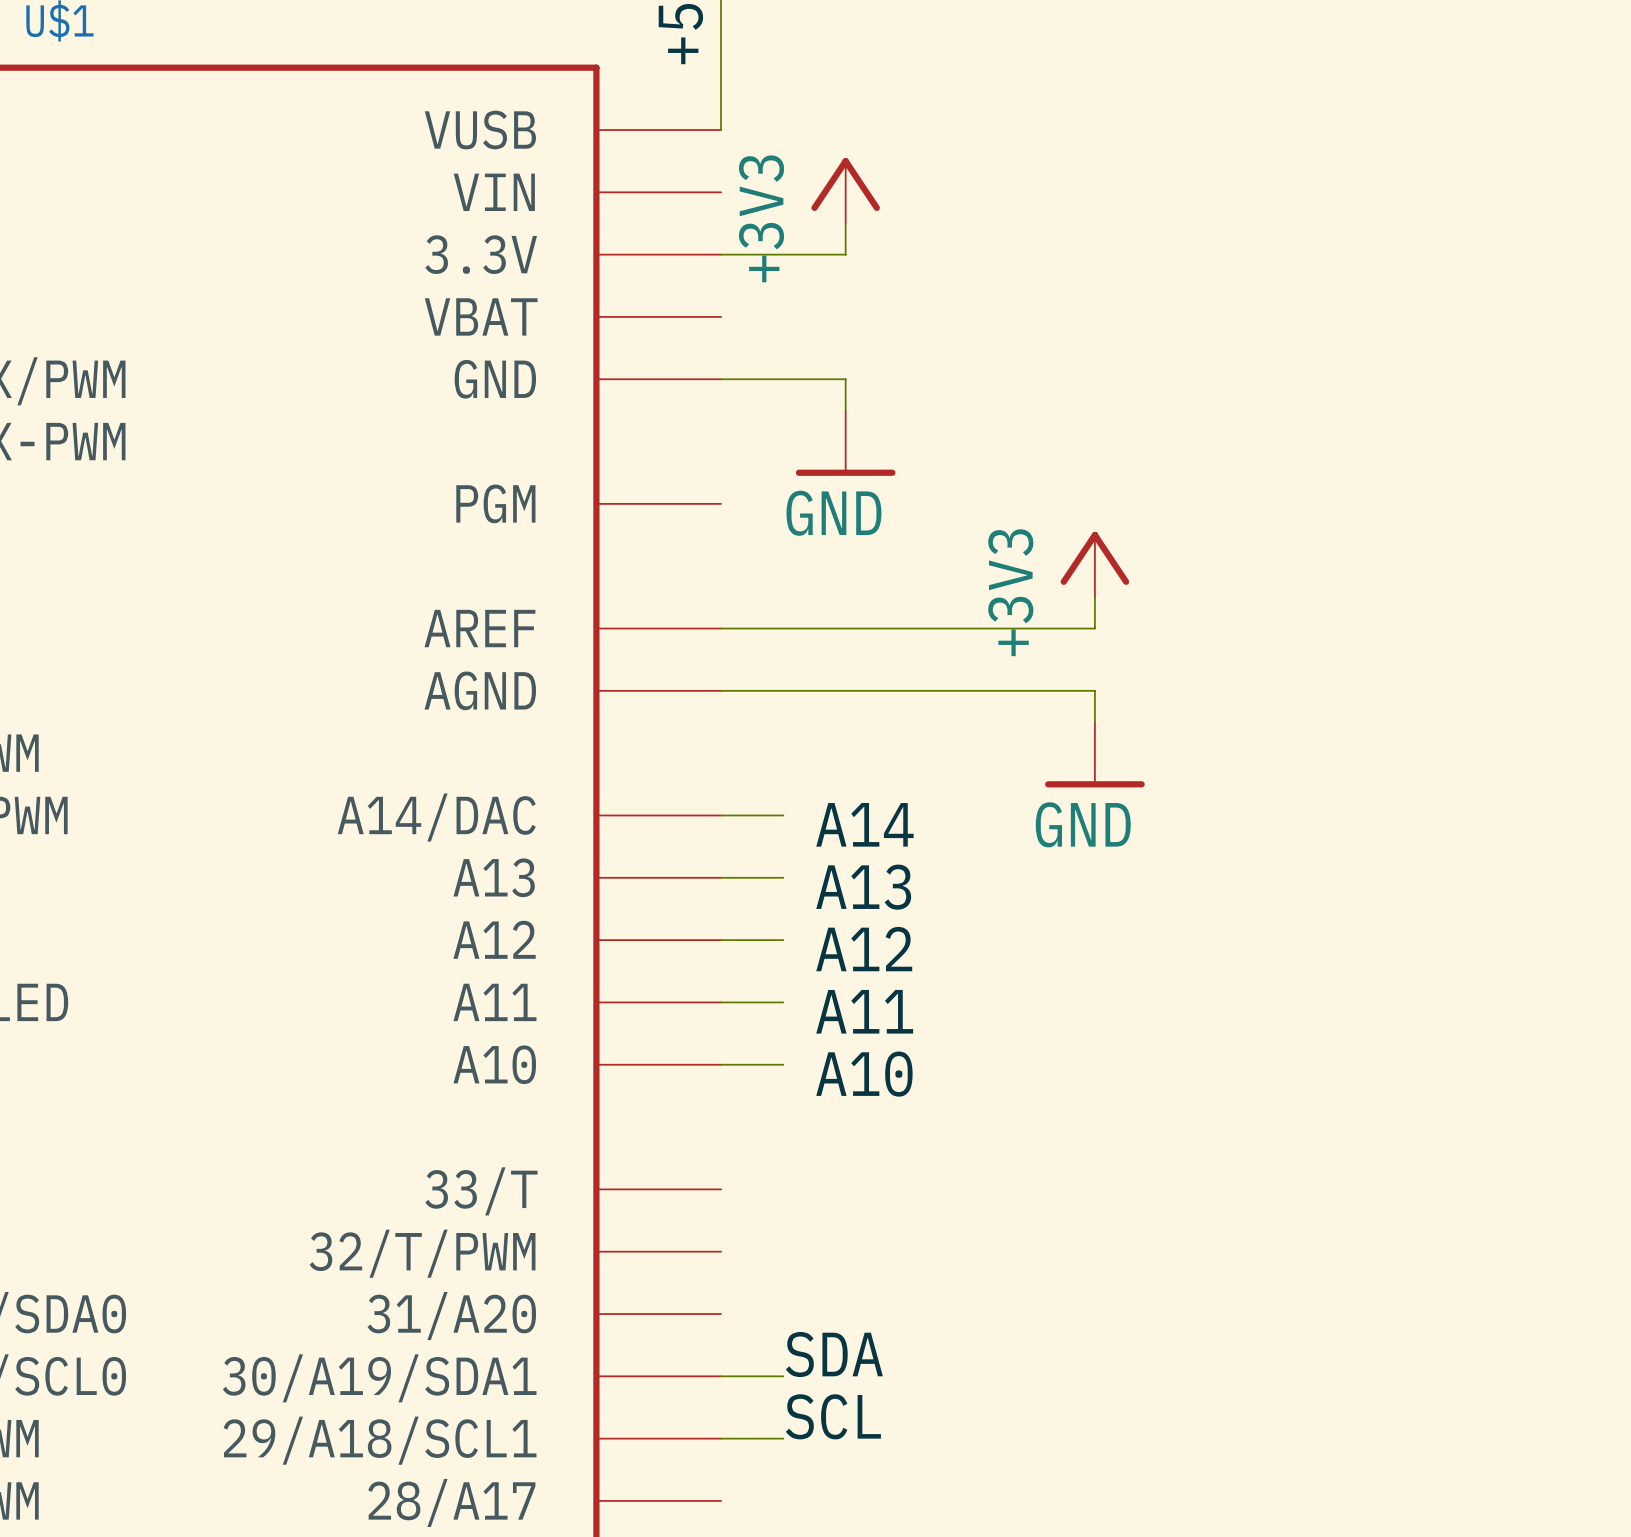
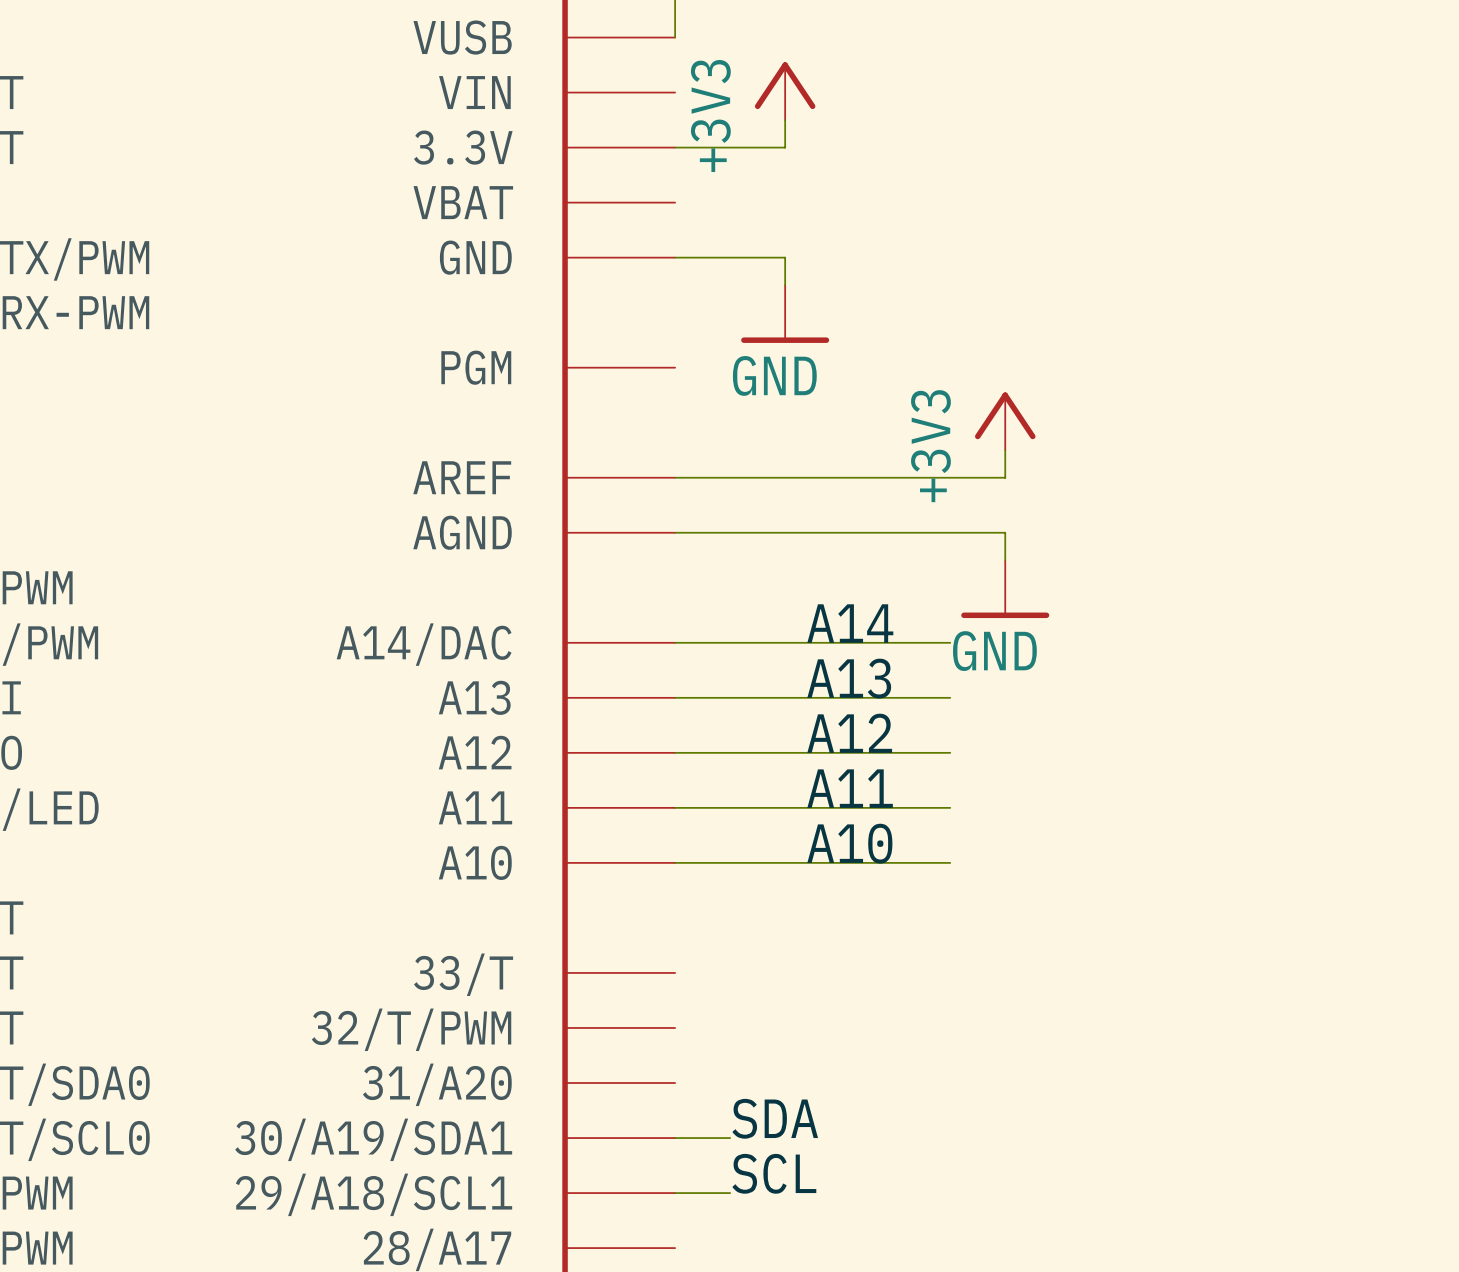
wire: none -> (730, 642) (950, 642)
label position: A14 (864, 824) -> A14 (850, 623)
wire: none -> (730, 697) (950, 697)
label position: A13 (863, 887) -> A13 (849, 678)
wire: none -> (730, 752) (950, 752)
label position: A12 (864, 949) -> A12 (849, 733)
wire: none -> (730, 807) (950, 807)
label position: A11 (864, 1011) -> A11 (850, 788)
wire: none -> (730, 862) (950, 862)
label position: A10 (864, 1074) -> A10 (849, 843)

